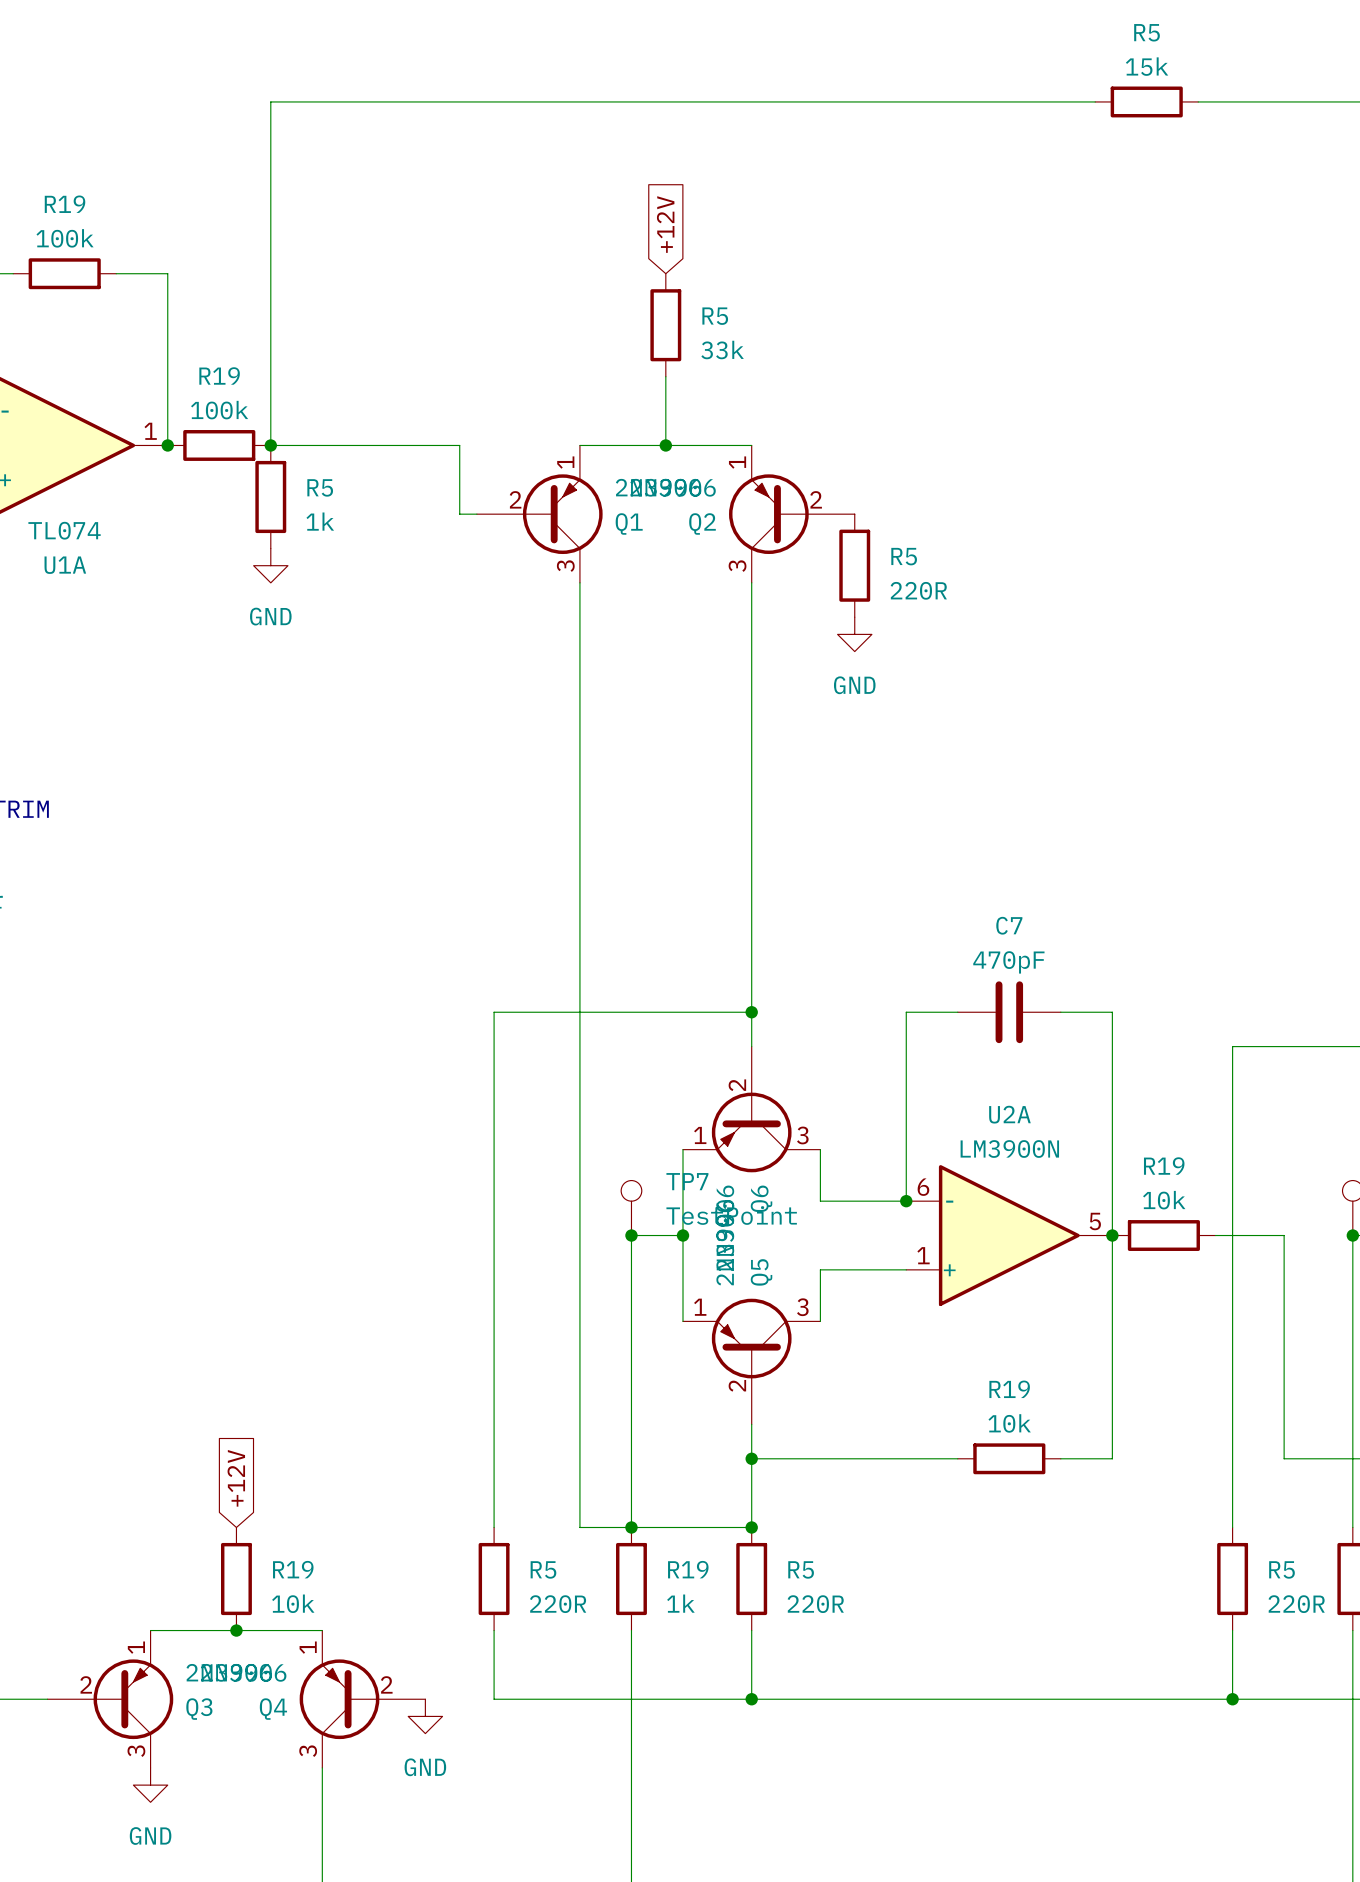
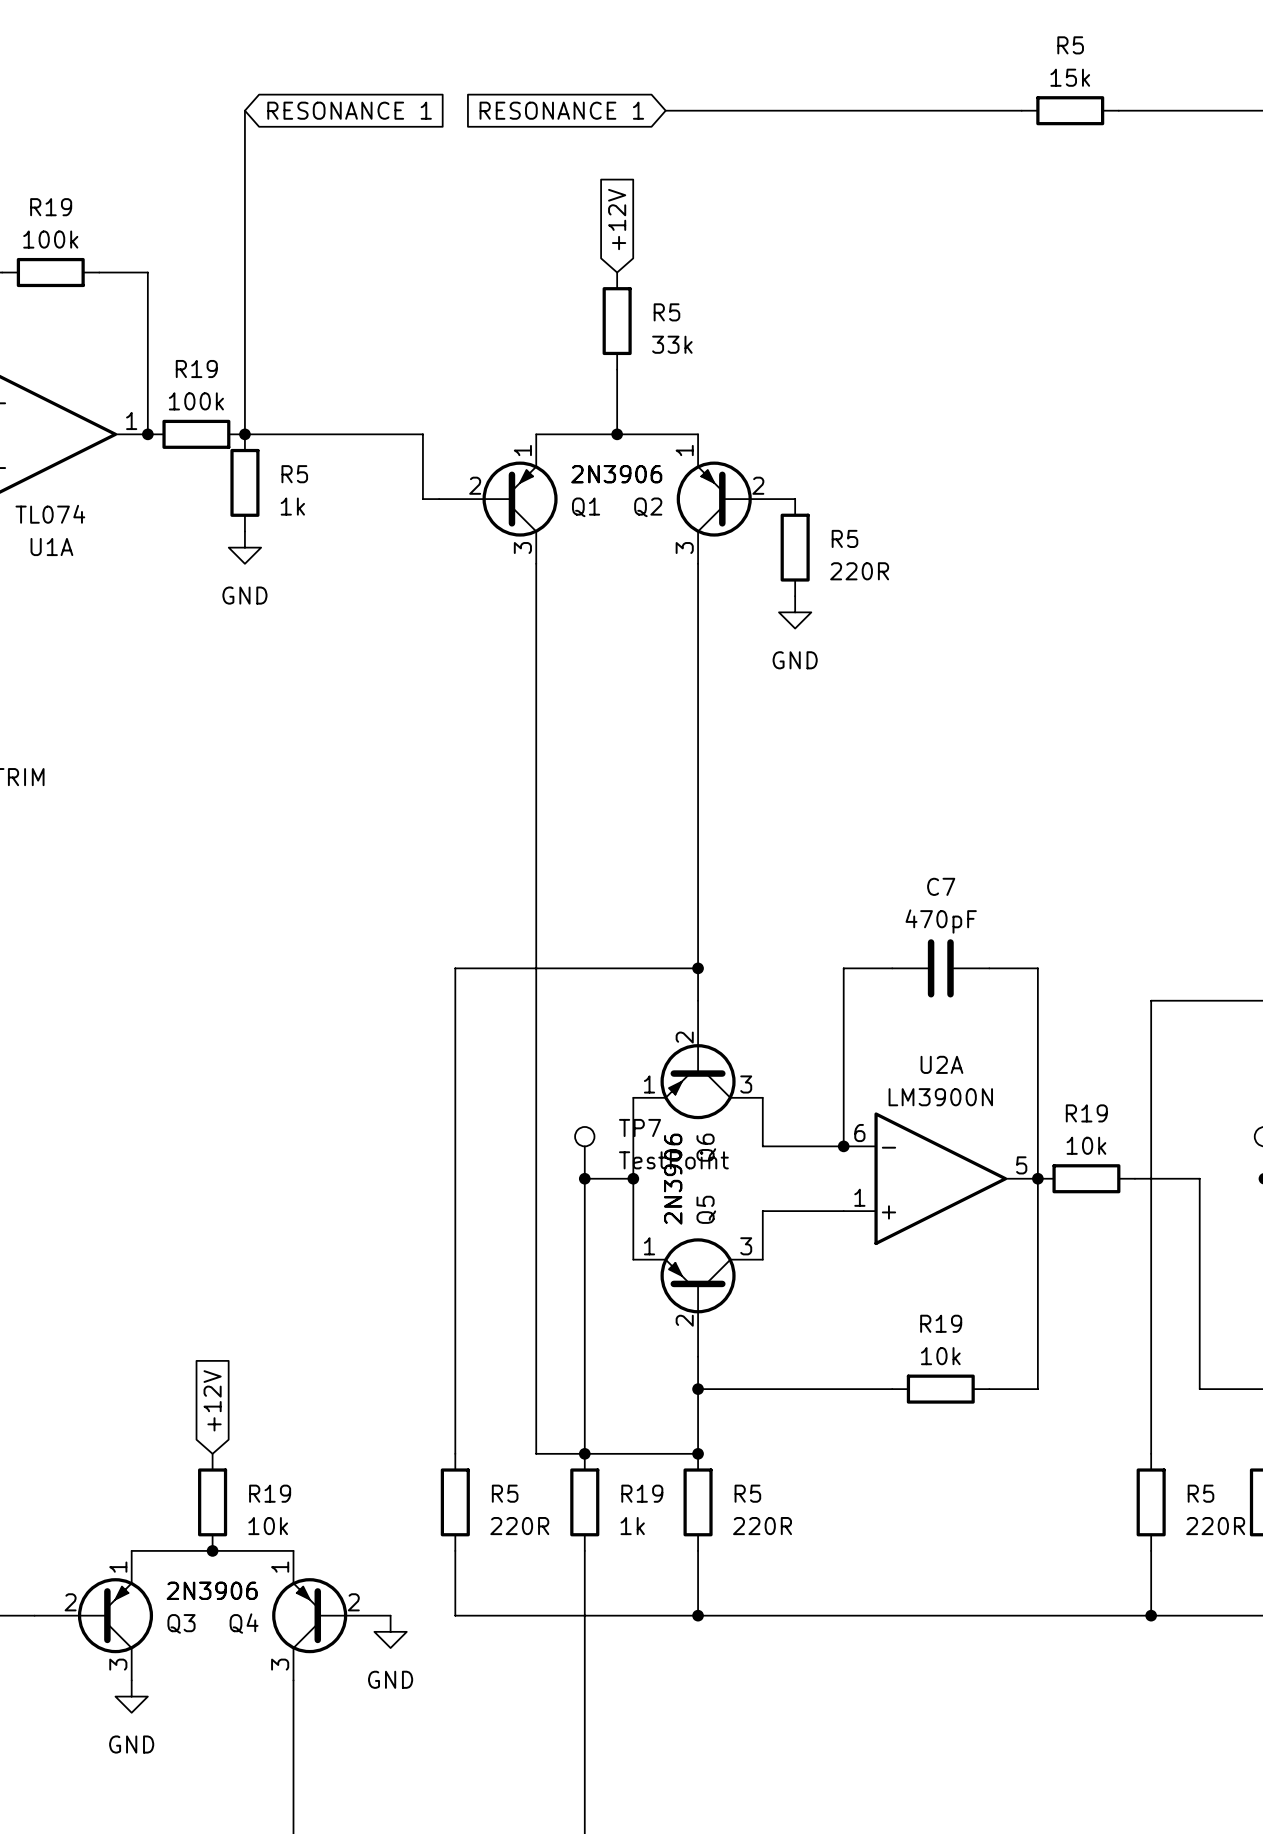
wire: (270, 101) (717, 101) -> none
global label: none -> RESONANCE 1 (349, 110)
global label: none -> RESONANCE 1 (561, 110)

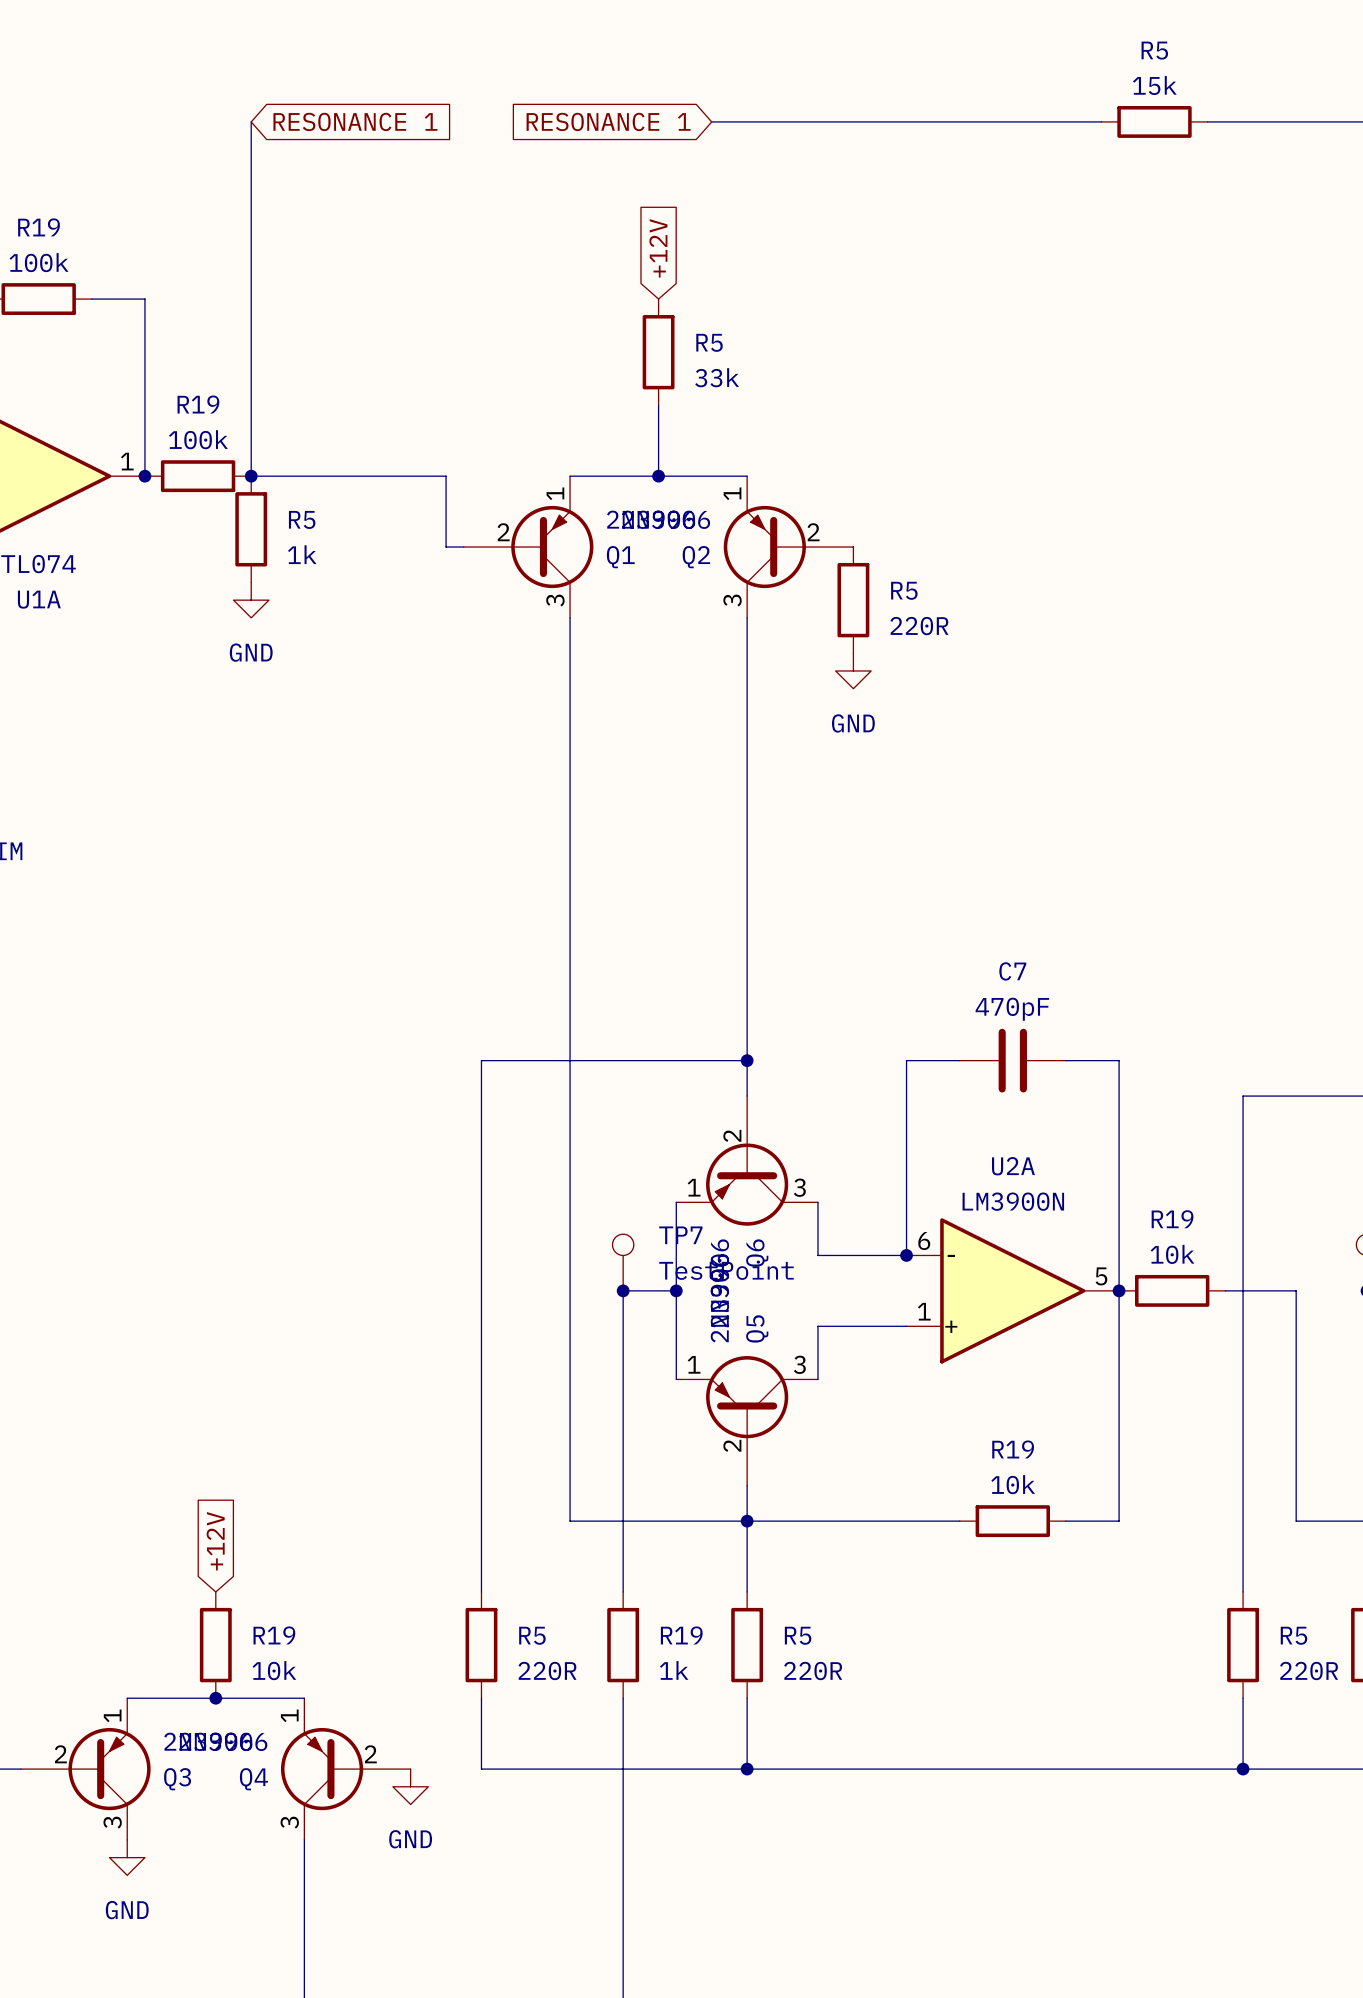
wire: (536, 1389) (536, 1453) (698, 1453) -> (570, 1521) (747, 1521)
junction: (584, 1453) -> none
junction: (698, 1453) -> none

